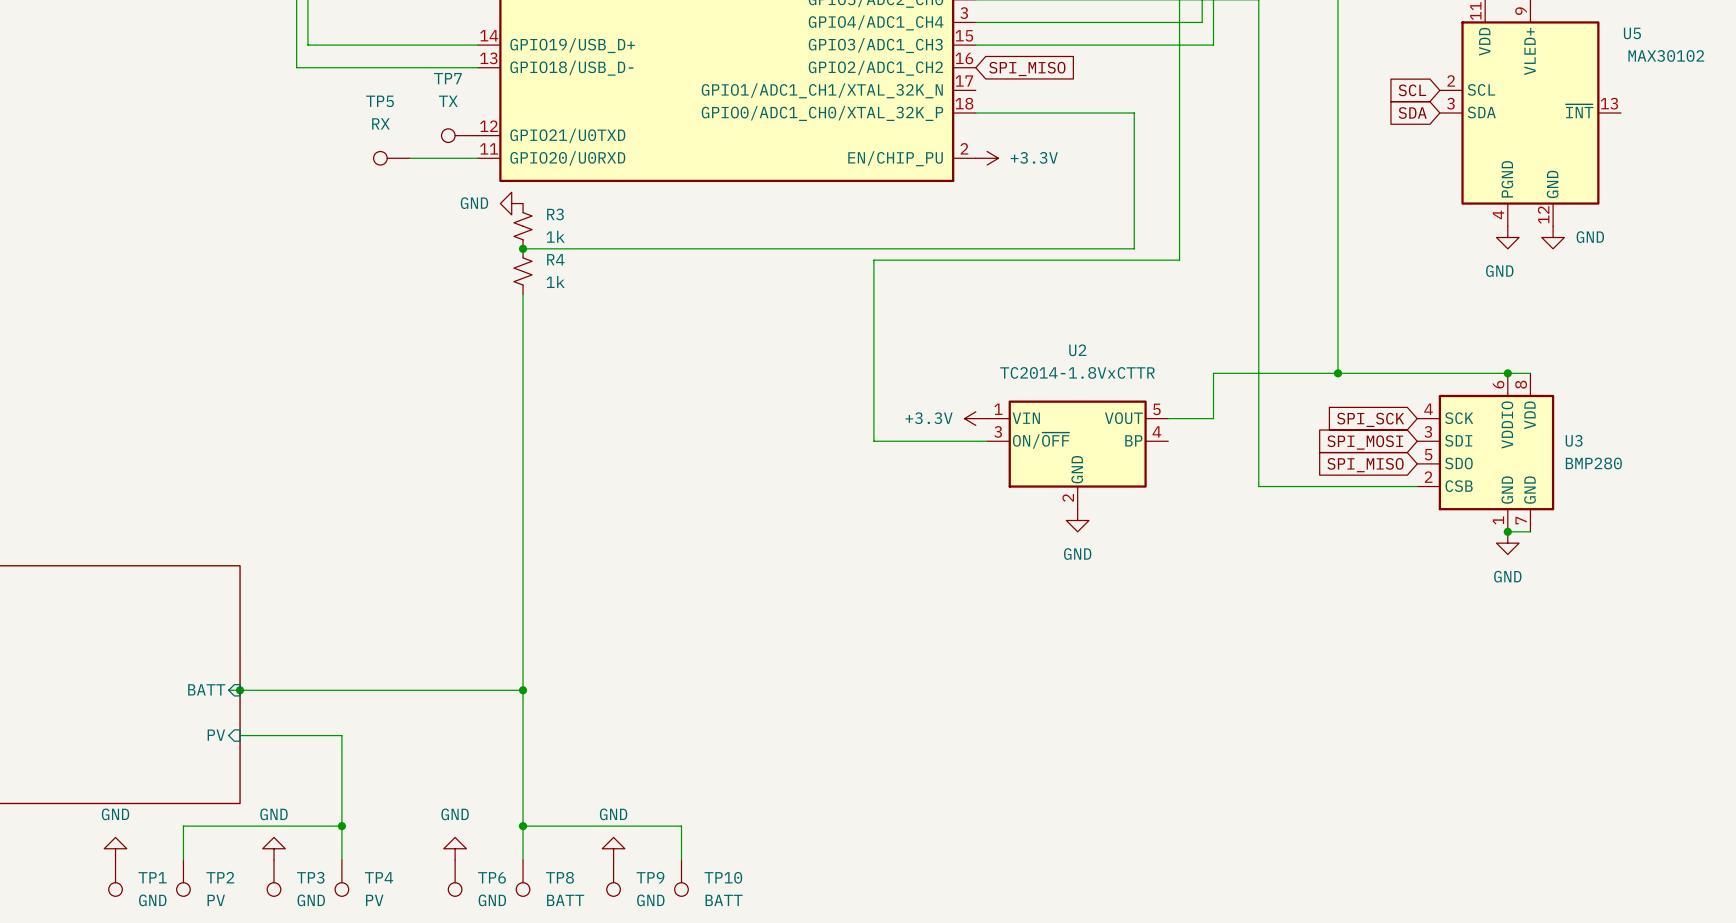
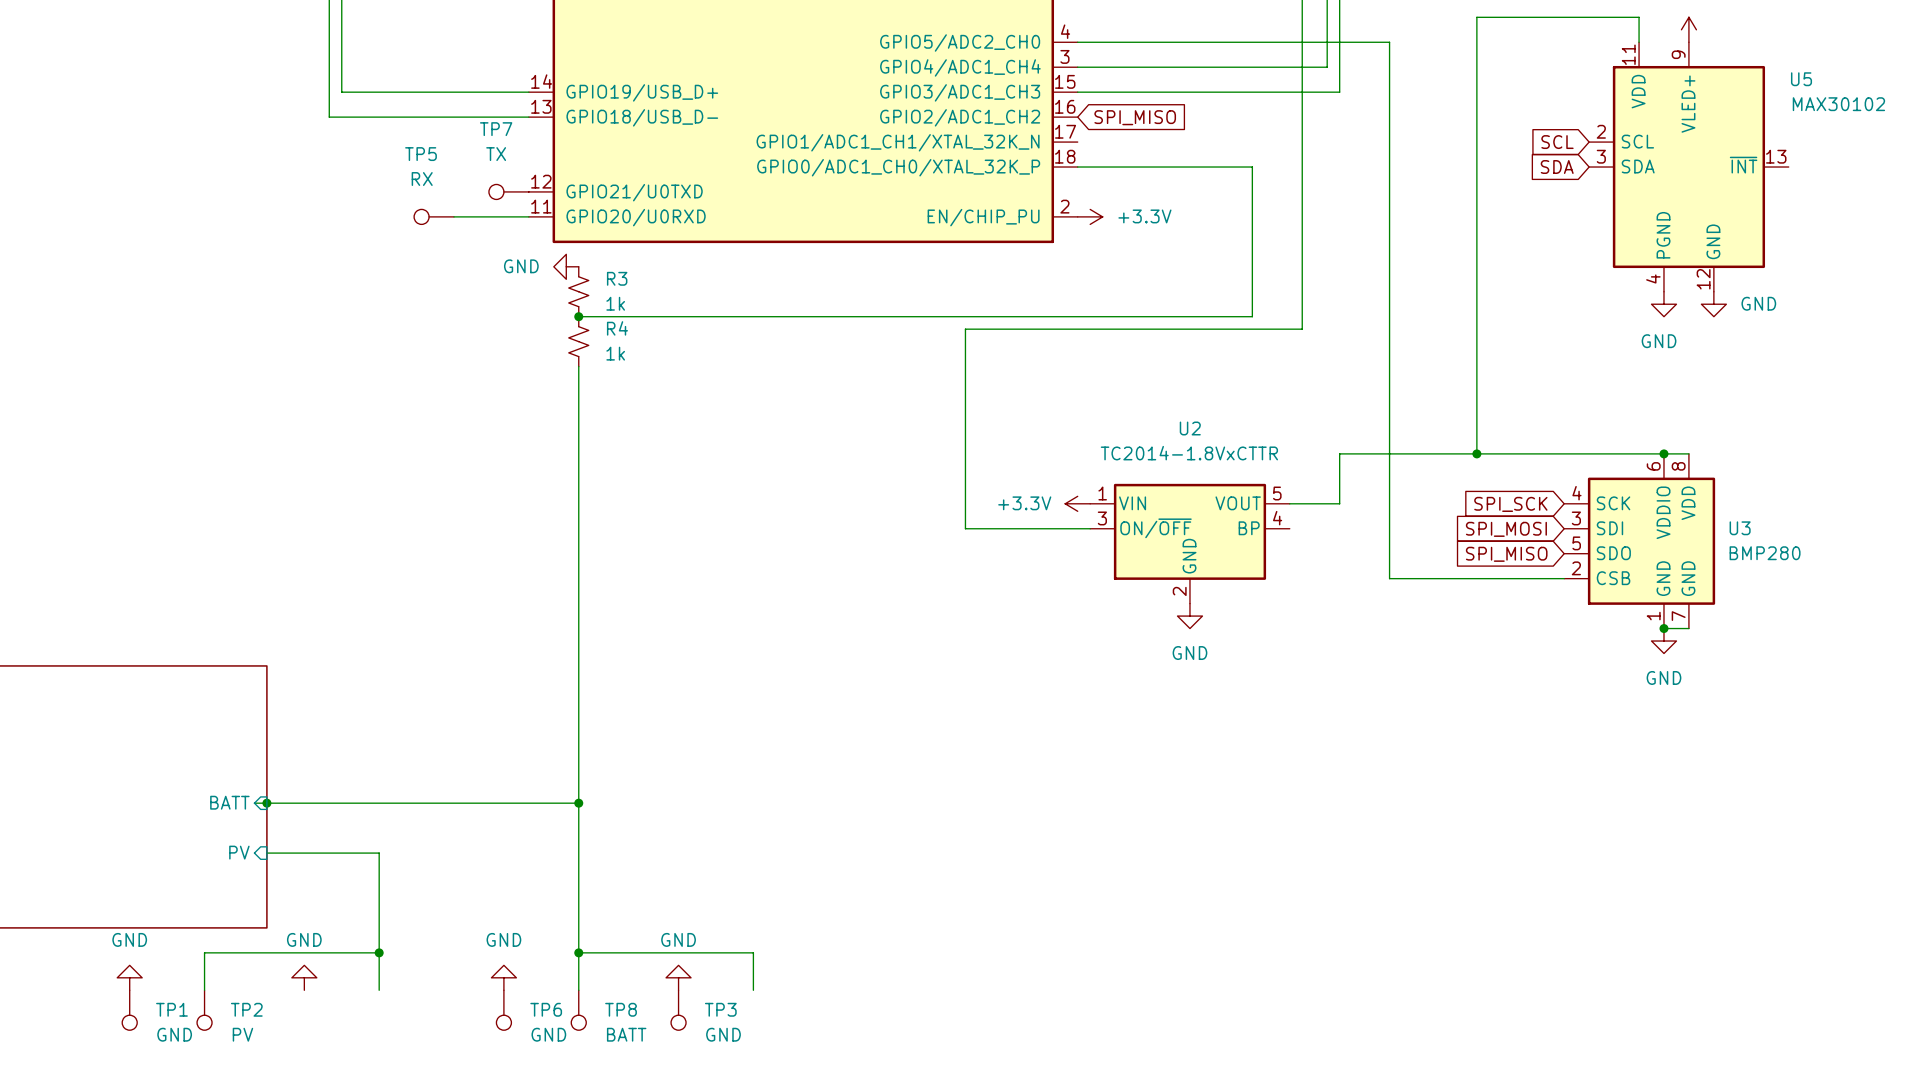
TP9 name: TP9 (650, 877) -> TP3 (720, 1009)
TP3: GND (274, 878) -> none
TP4: PV (341, 878) -> none
TP10: BATT (681, 878) -> none

